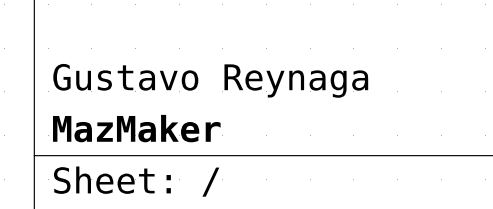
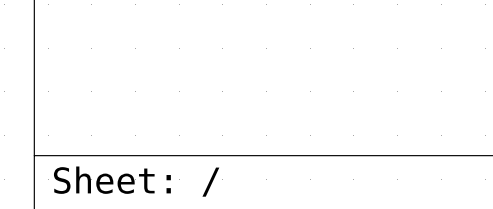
title block: Gustavo Reynaga (210, 80) -> none
title block: MazMaker (136, 128) -> none

